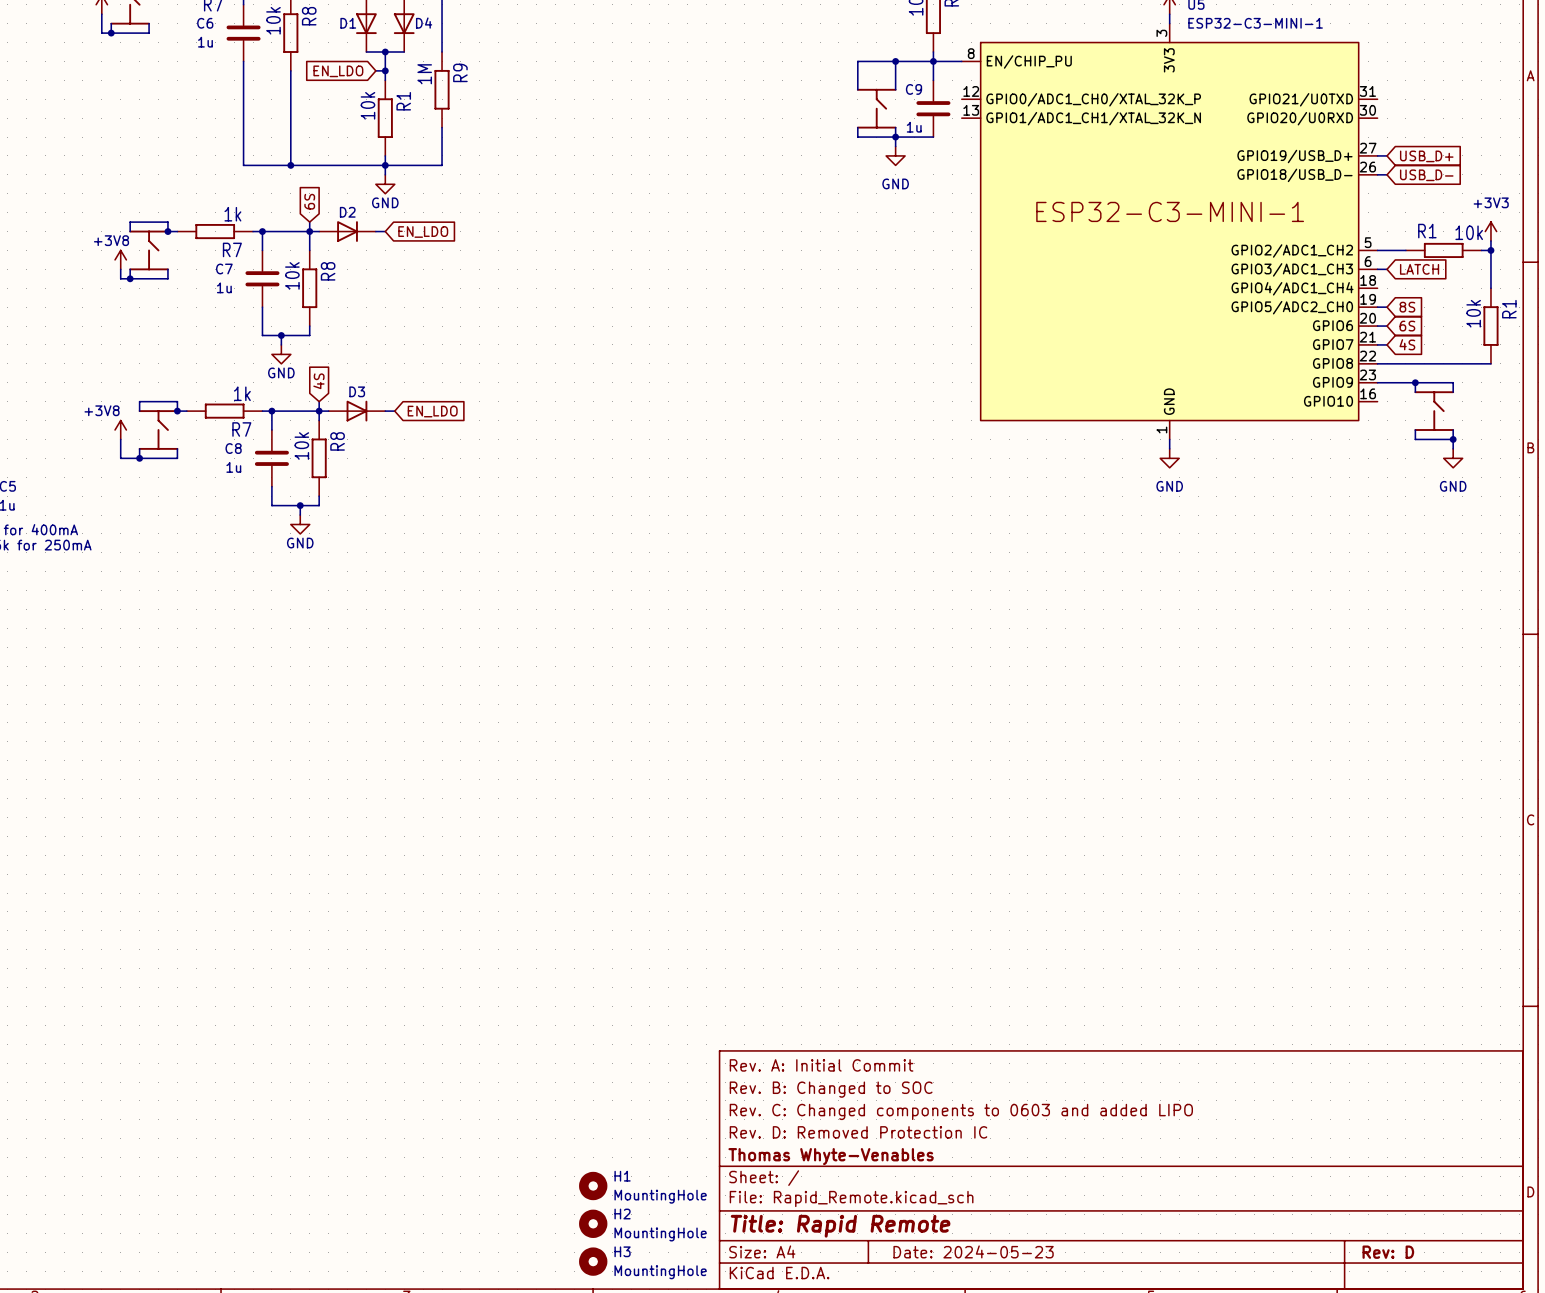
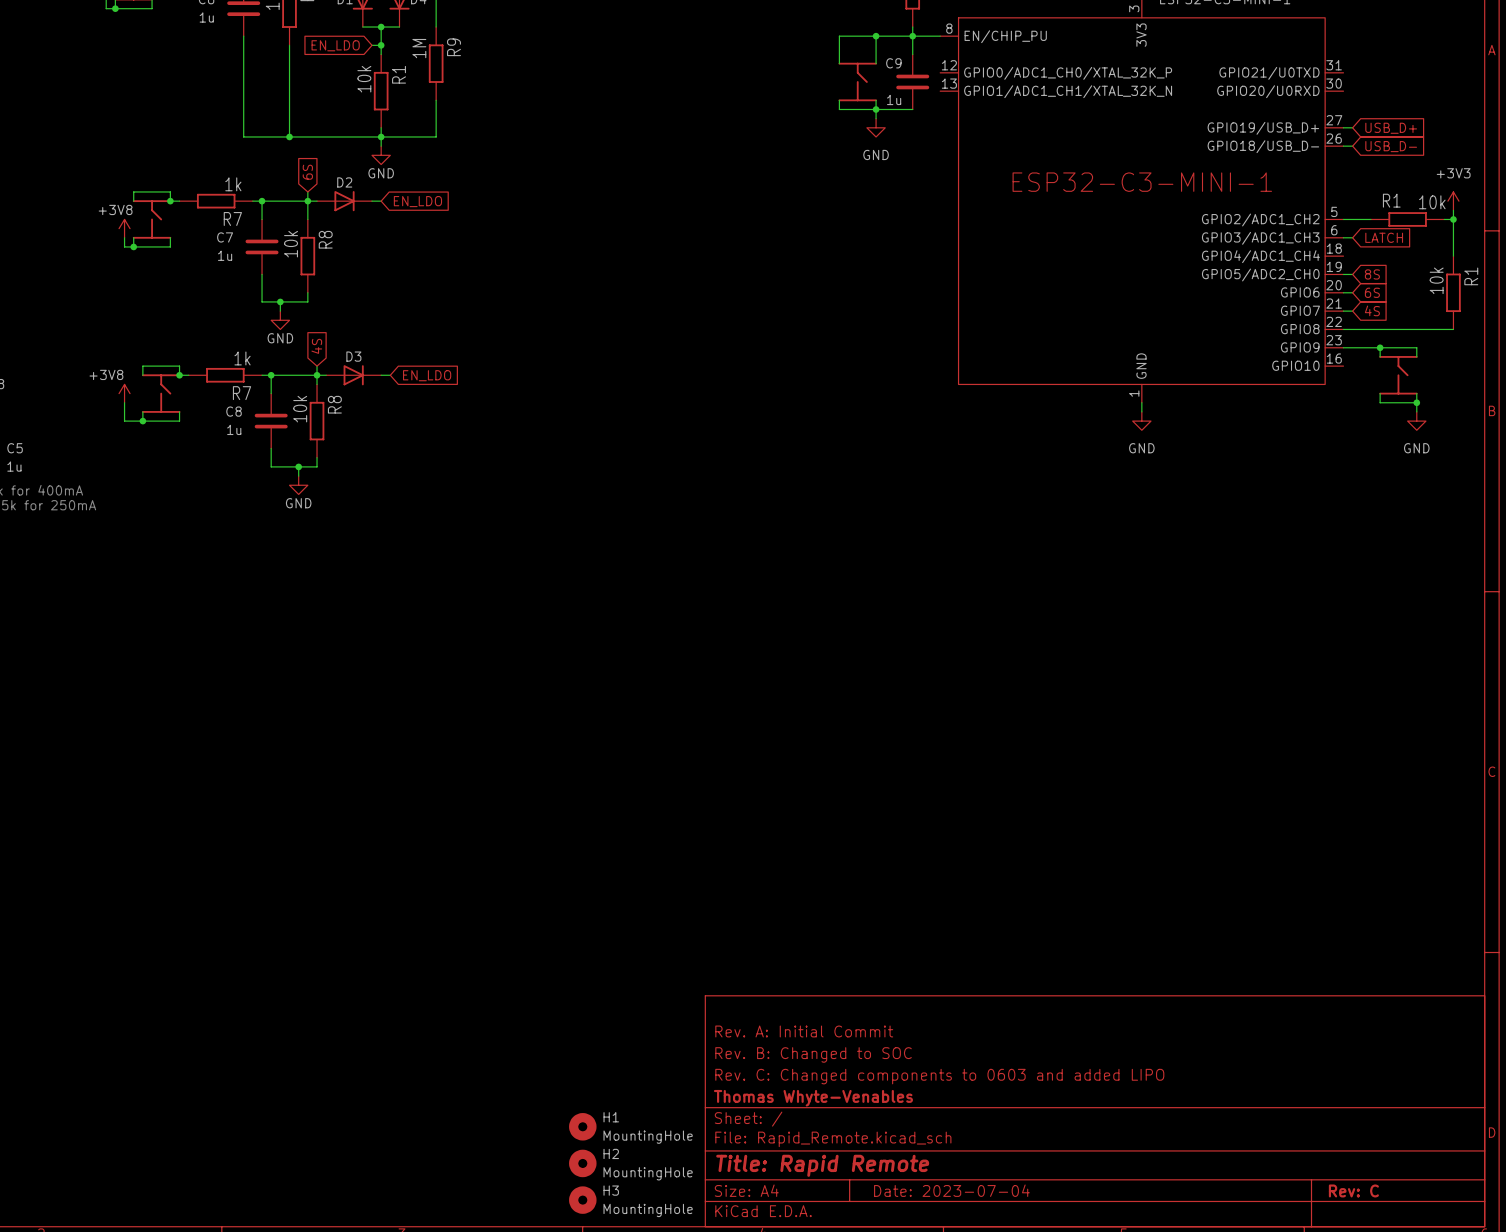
title block: Rev. A: Initial Commit (821, 1065) -> none
title block: Rev. B: Changed to SOC (831, 1089) -> Rev. A: Initial Commit (804, 1031)
title block: Rev. C: Changed components to 0603 and added LIPO (961, 1111) -> Rev. B: Changed to SOC (813, 1054)
title block: Rev. D: Removed Protection IC (858, 1132) -> Rev. C: Changed components to 0603 and added LIPO (939, 1076)
title block: Date: 2024-05-23 (973, 1251) -> Date: 2023-07-04 (951, 1190)
title block: Rev: D (1388, 1252) -> Rev: C (1353, 1190)

